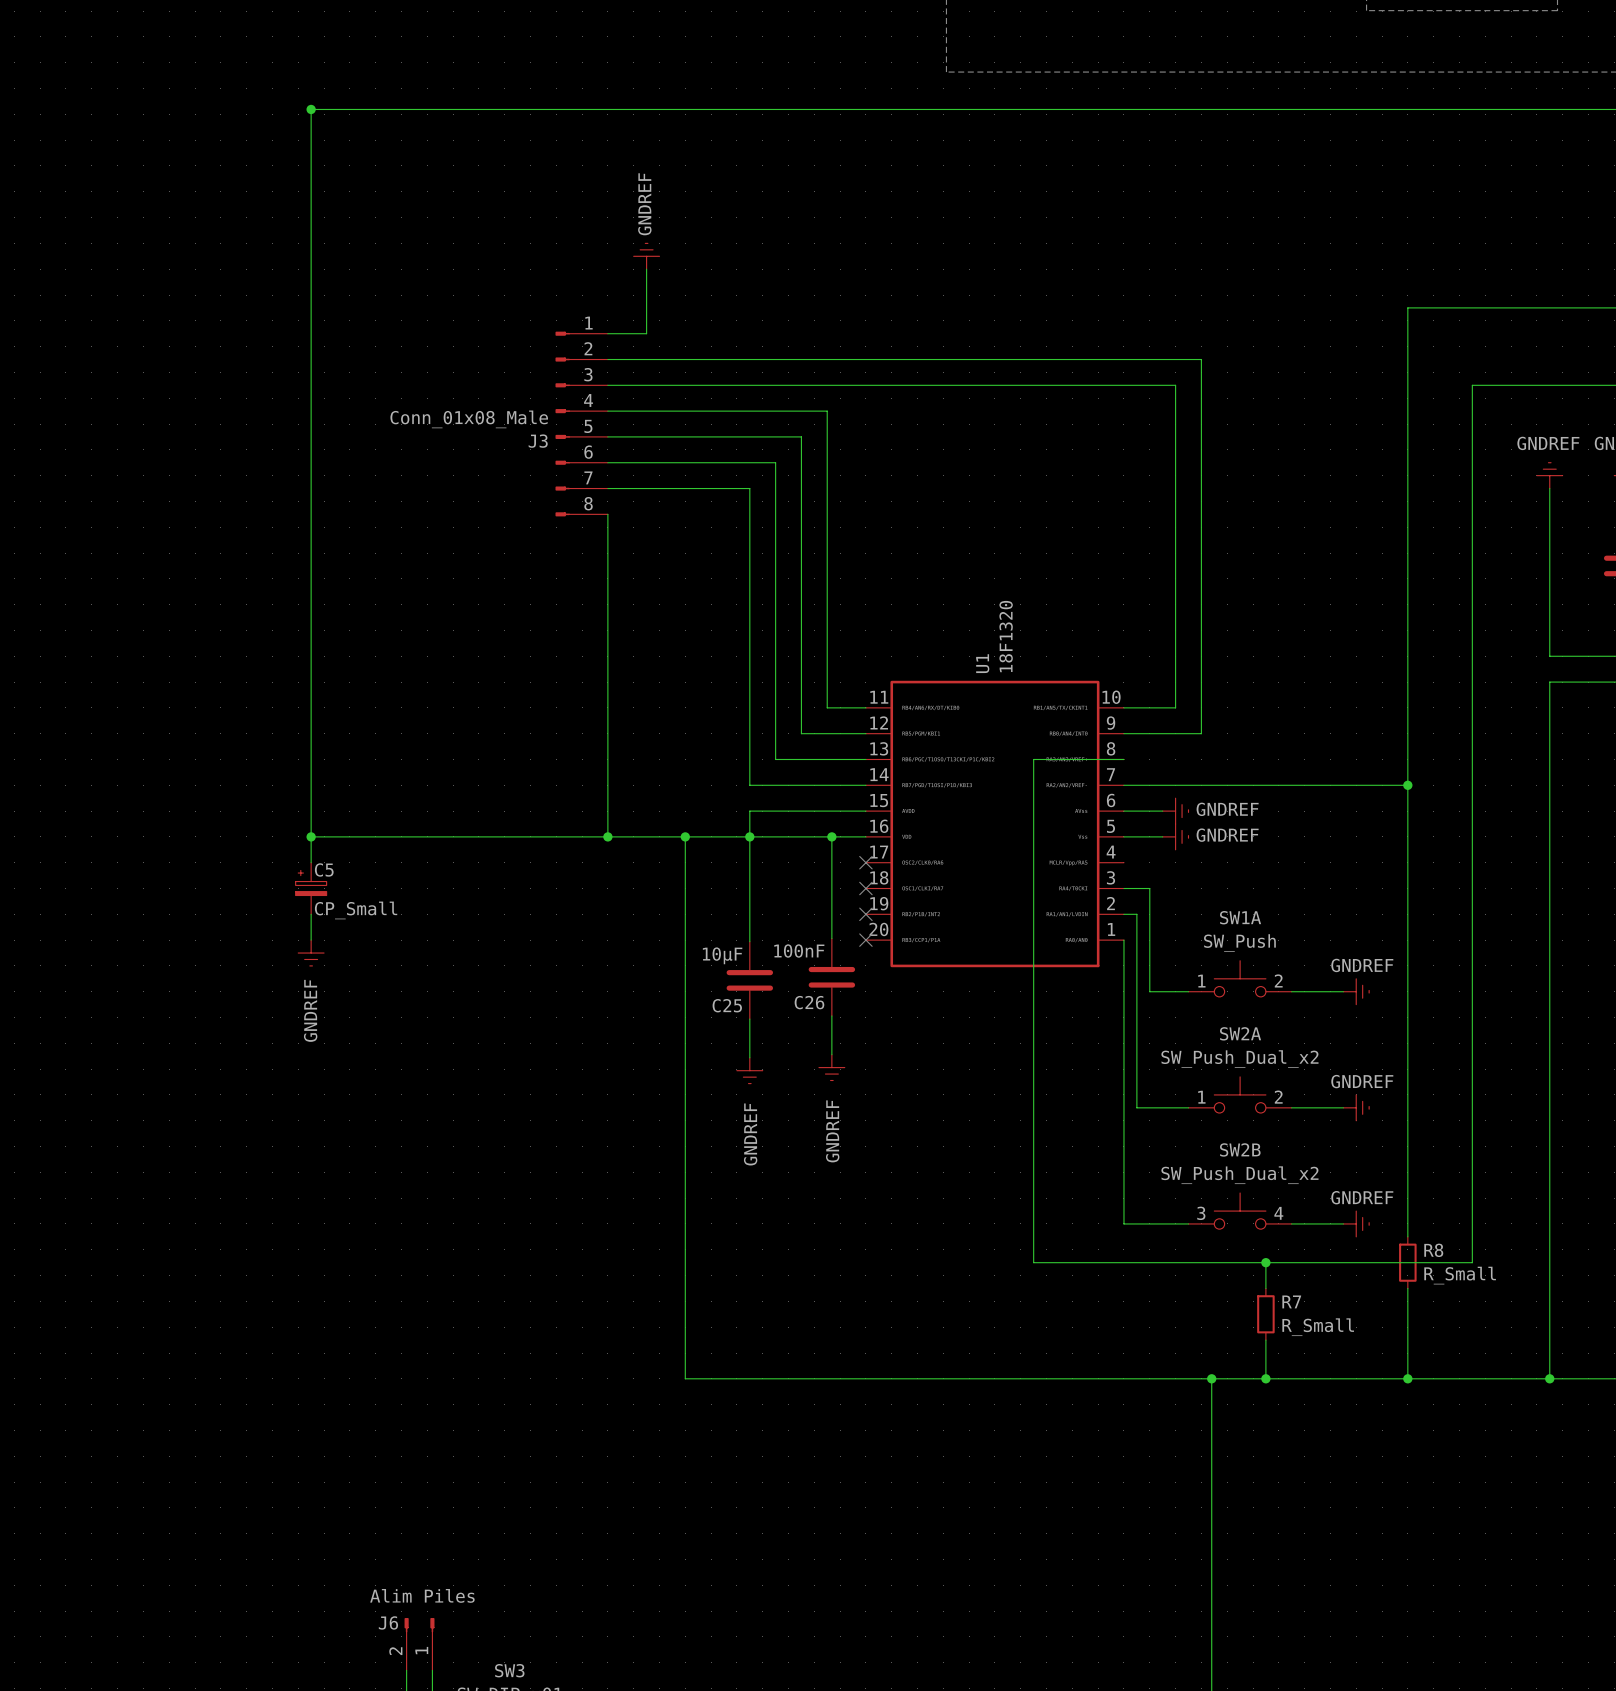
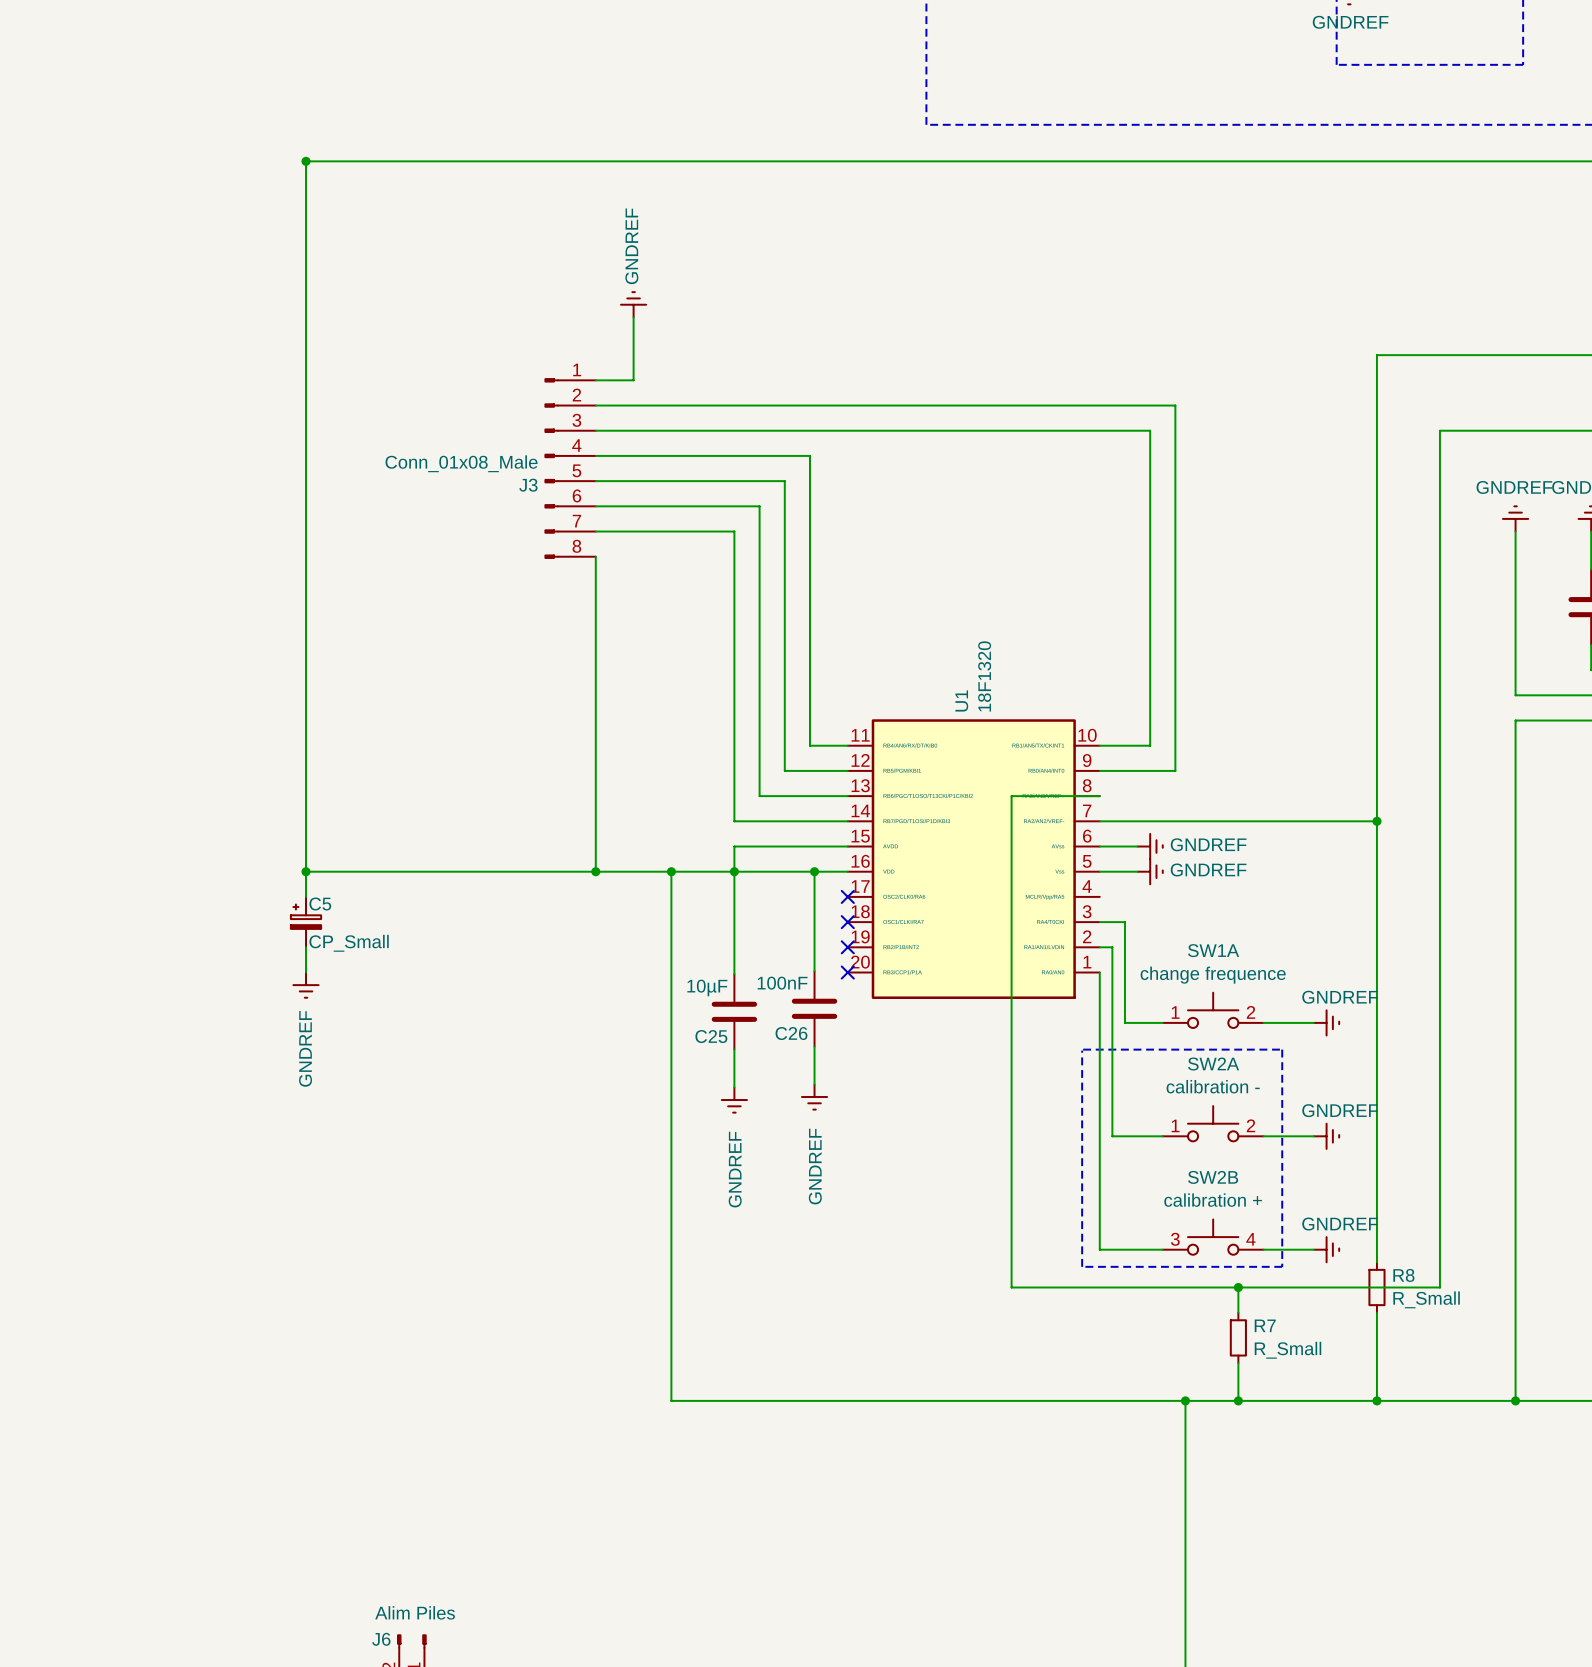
SW1A value: SW_Push (1239, 943) -> change frequence (1213, 975)
line: none -> (1083, 1049) (1282, 1049) (1282, 1266) (1082, 1266) (1082, 1050)
SW2A value: SW_Push_Dual_x2 (1239, 1059) -> calibration - (1213, 1086)
SW2B value: SW_Push_Dual_x2 (1239, 1175) -> calibration + (1213, 1200)

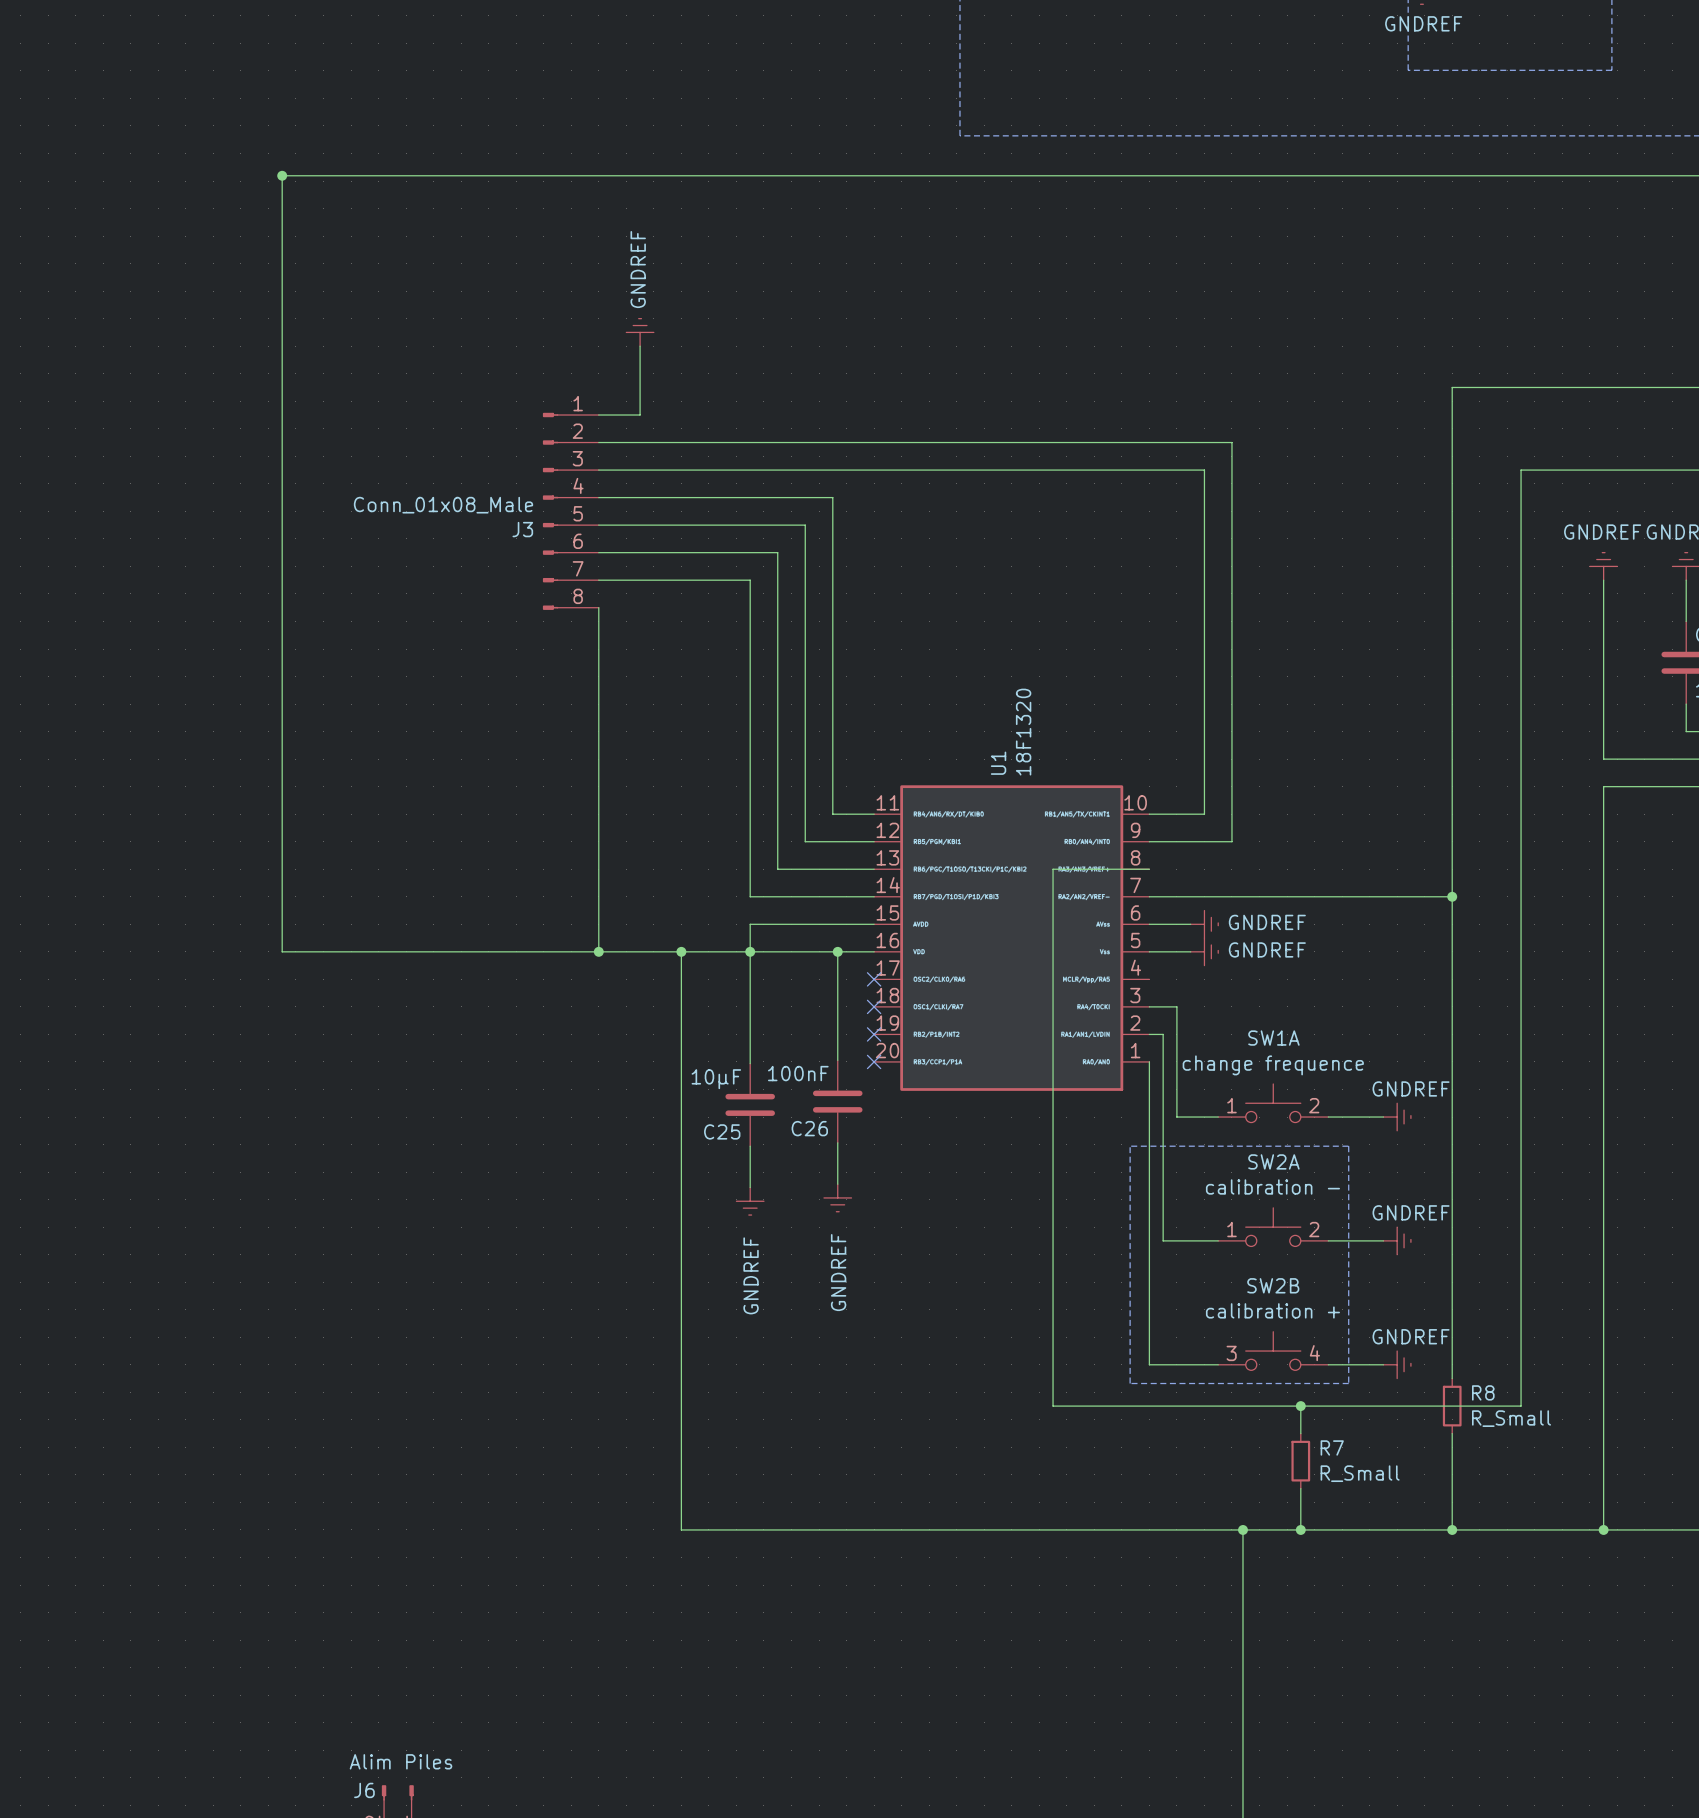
wire: (306, 871) (306, 896) -> none
junction: (306, 871) -> none
C5: CP_Small (306, 922) -> none
wire: (306, 947) (306, 972) -> none
power symbol: GNDREF (306, 985) -> none

